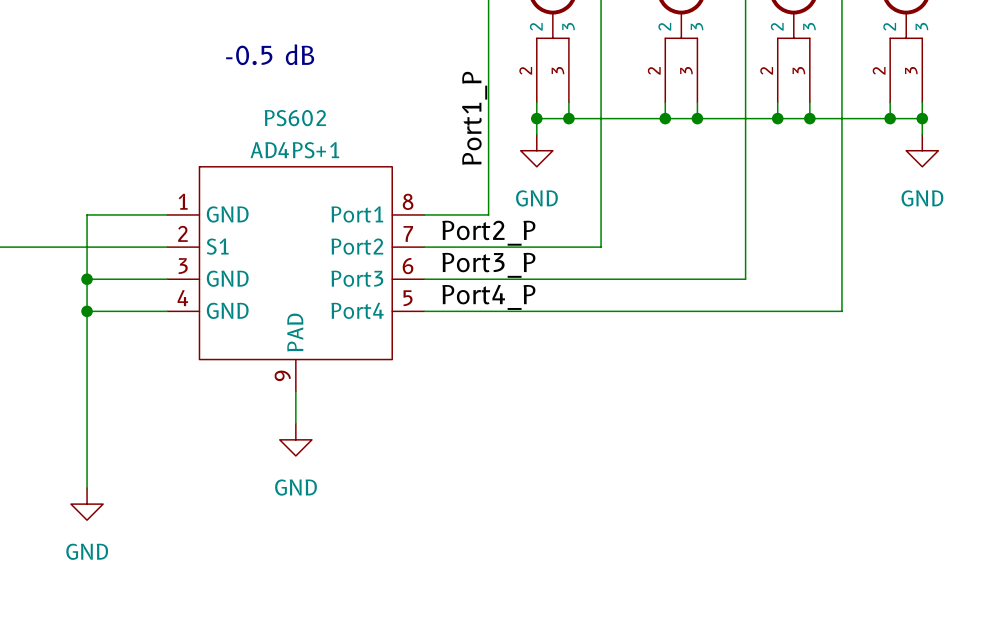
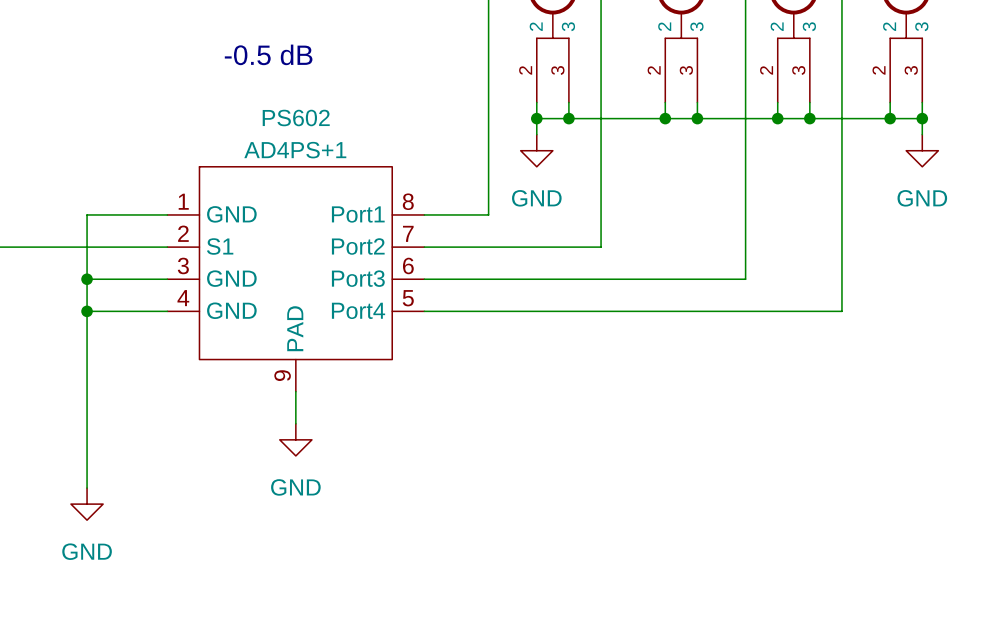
label: Port1_P (474, 118) -> none
label: Port2_P (488, 233) -> none
label: Port3_P (488, 265) -> none
label: Port4_P (488, 297) -> none

